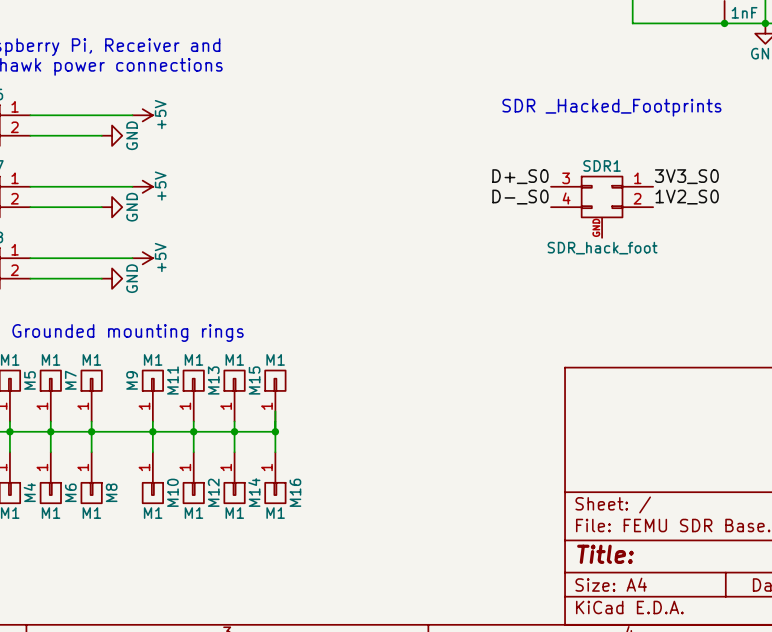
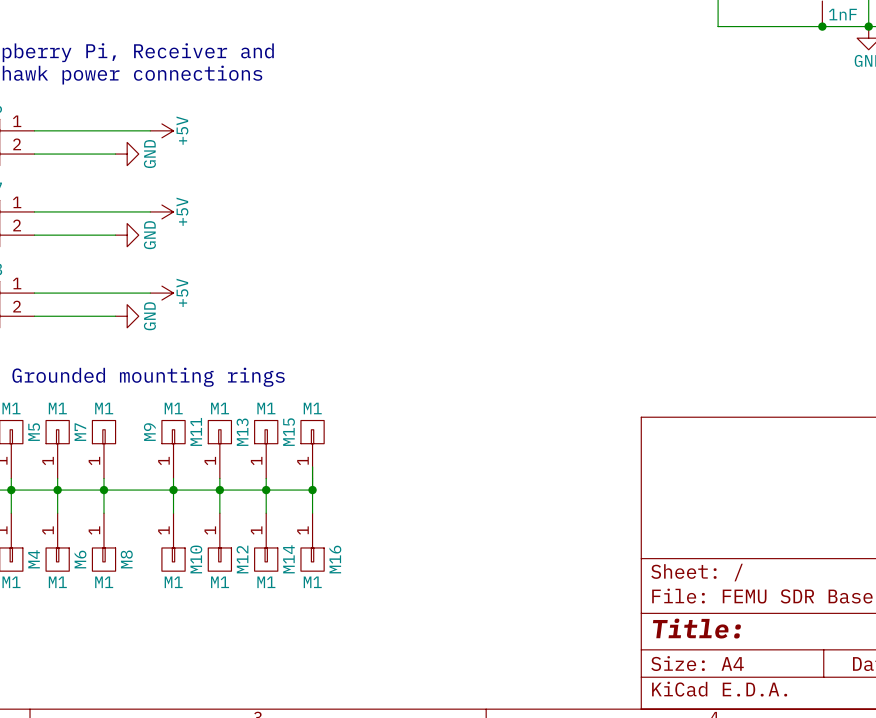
text: SDR _Hacked_Footprints (611, 107) -> none
label: D+_S0 (520, 176) -> none
label: 3V3_S0 (686, 176) -> none
label: D-_S0 (520, 197) -> none
label: 1V2_S0 (687, 197) -> none
SDR1: SDR_hack_foot (602, 207) -> none

